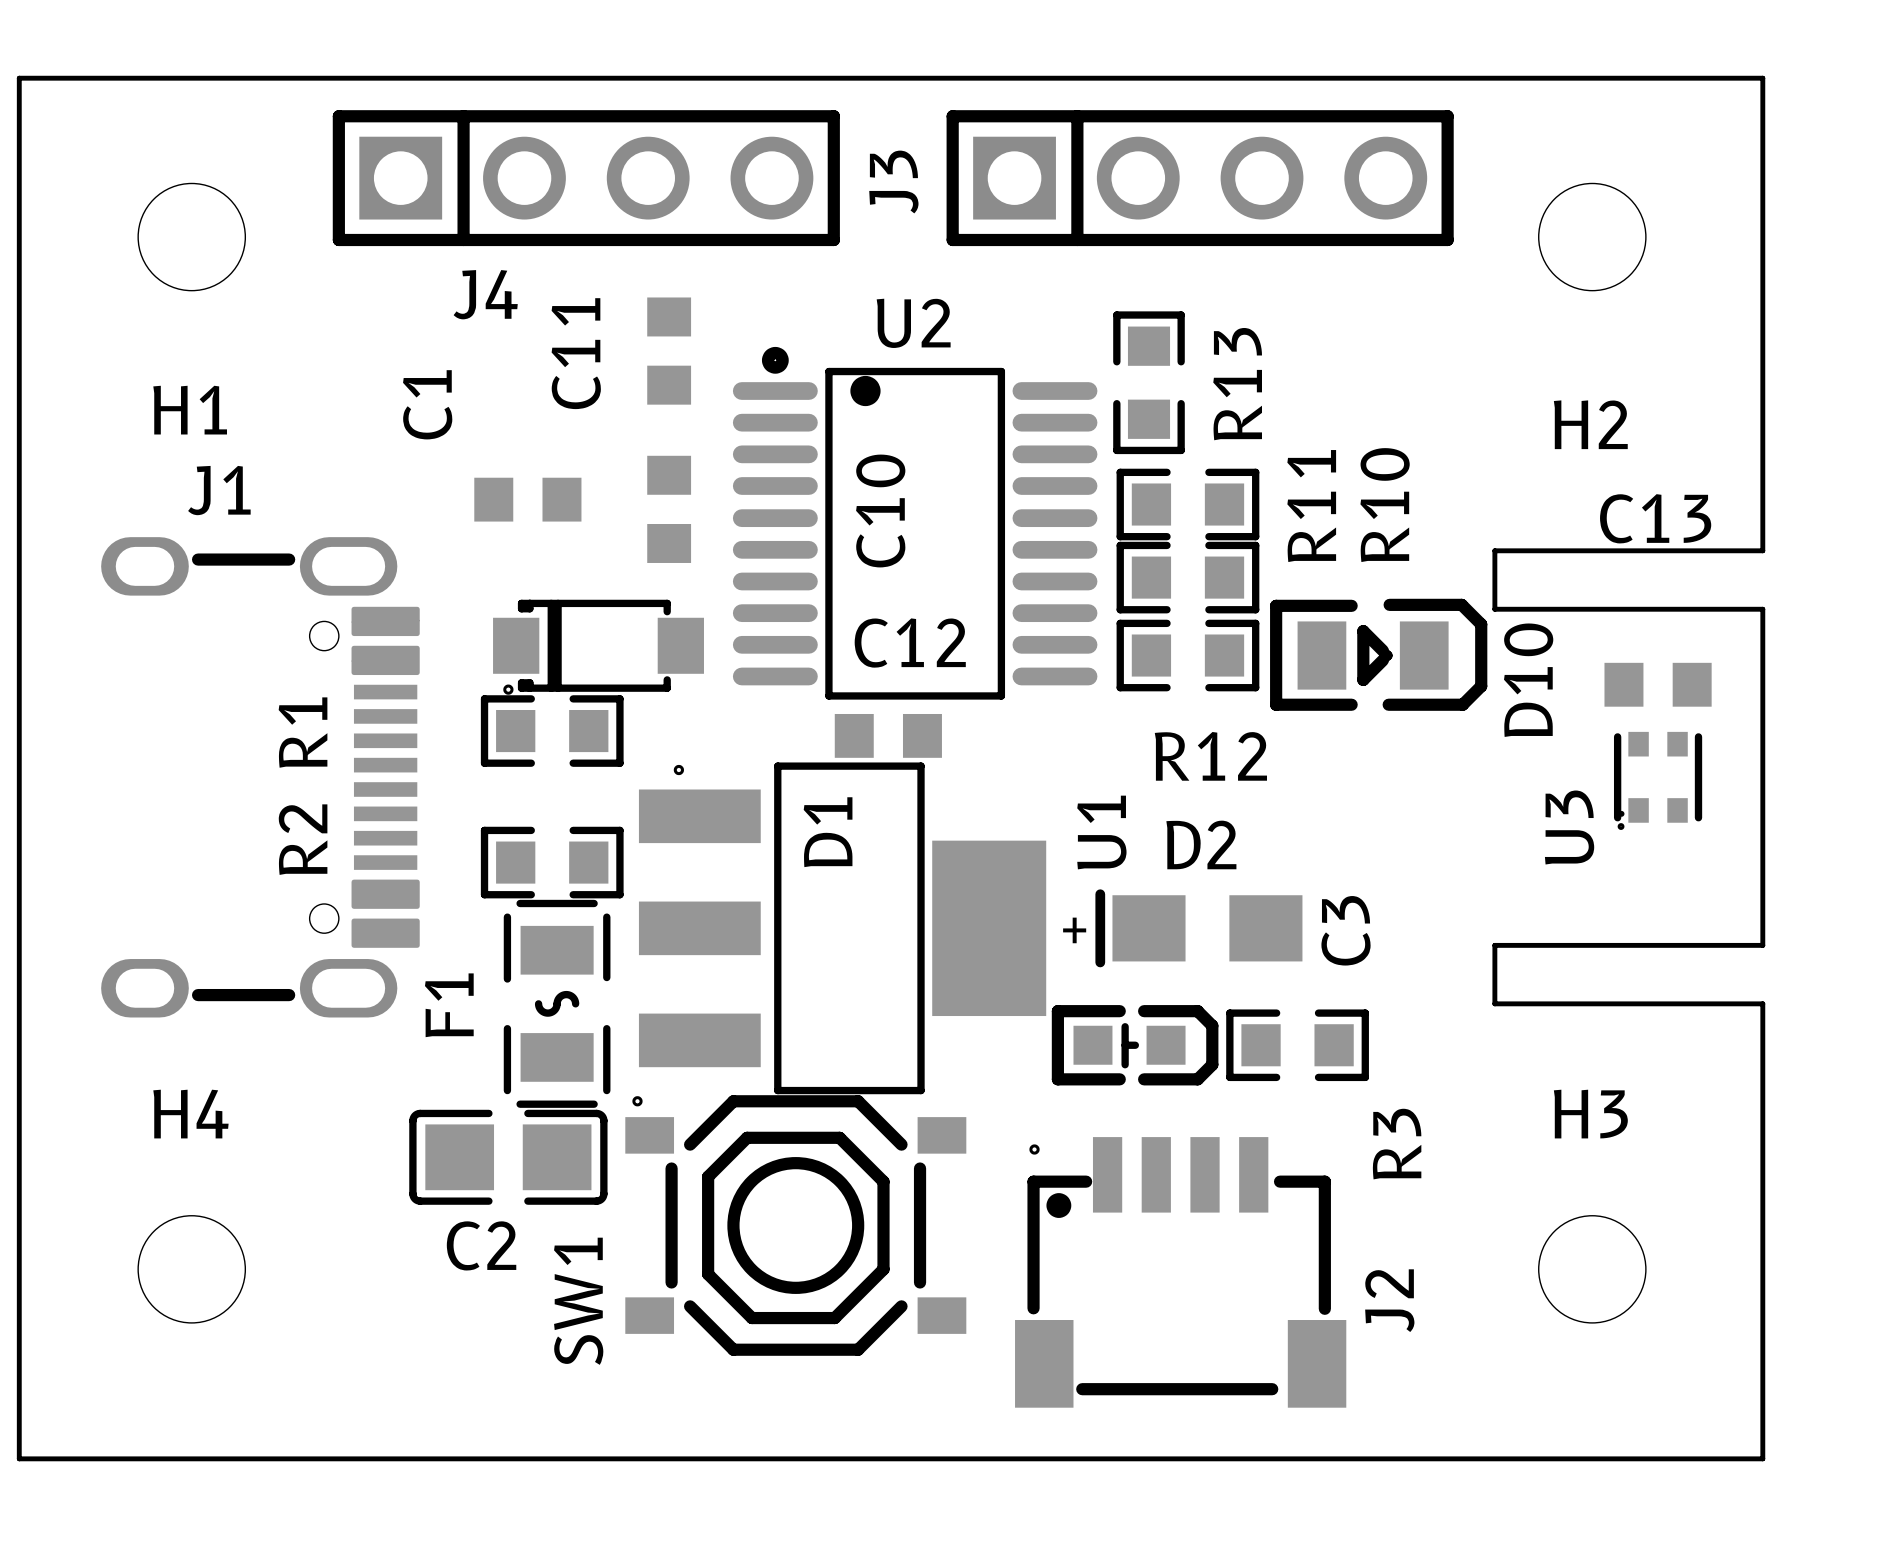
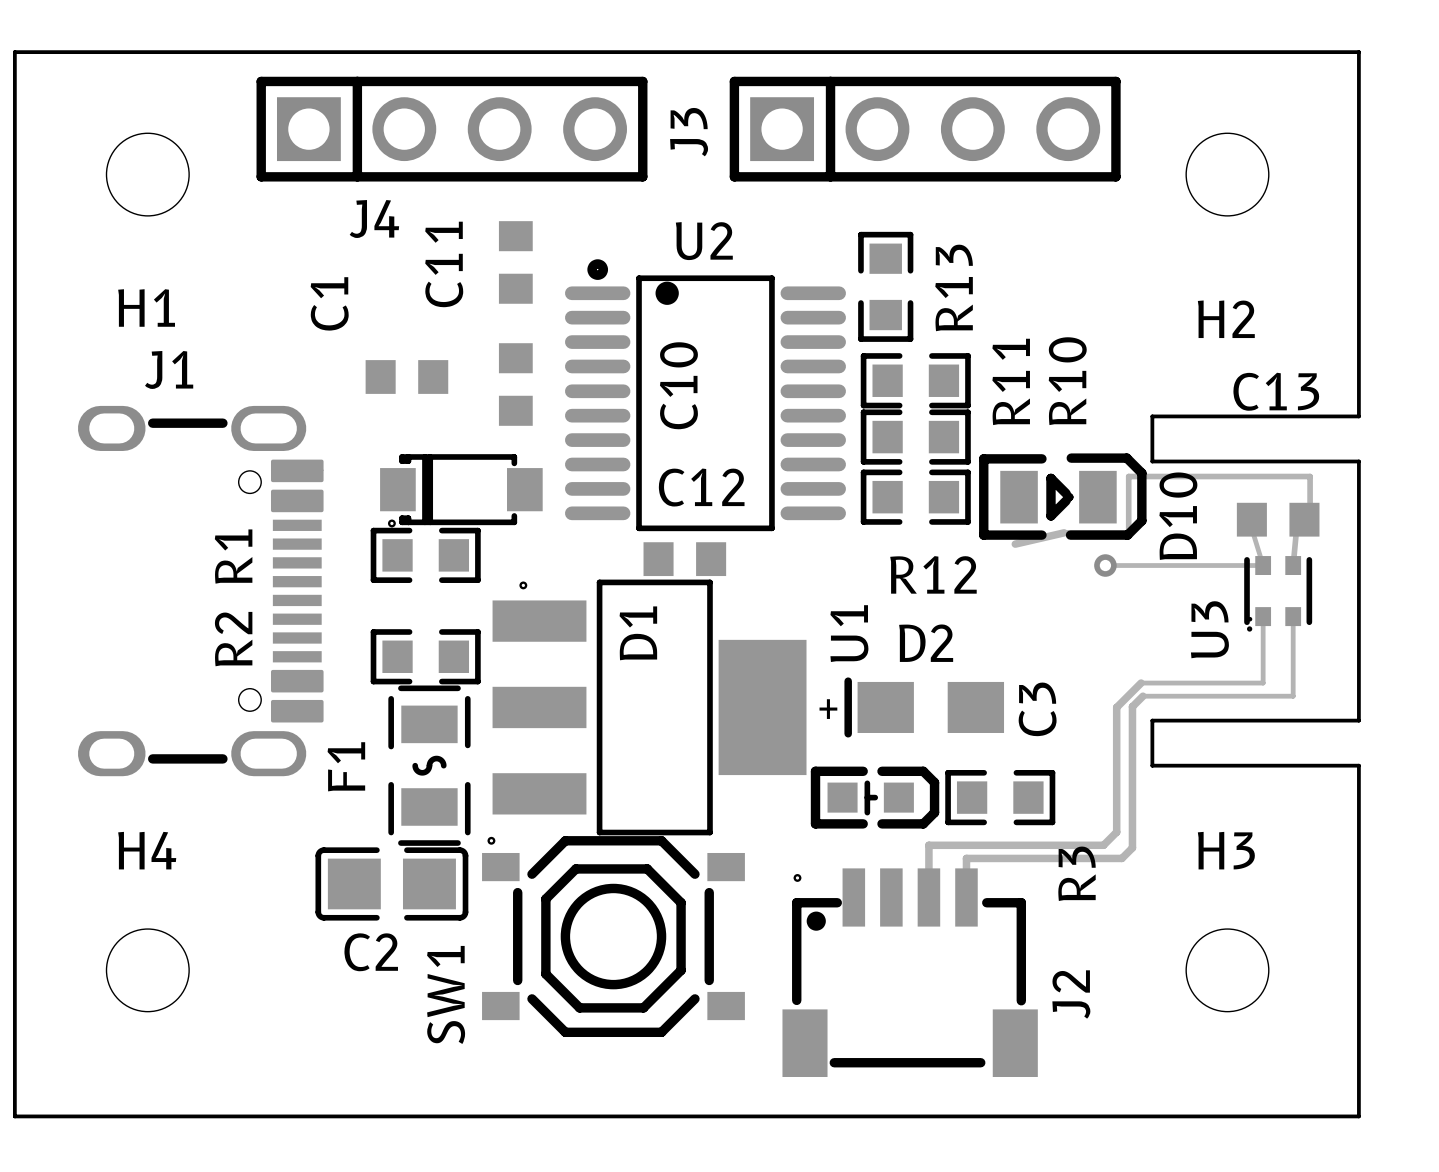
track: none -> (1310, 519) (1310, 476) (1128, 476) (1128, 532) (1064, 532) (1015, 544)
track: none -> (1296, 525) (1293, 565)
track: none -> (1251, 529) (1263, 565) (1105, 565)
via: none -> (1105, 565)
track: none -> (1263, 616) (1263, 683) (1141, 683) (1116, 707) (1116, 832) (1103, 845) (928, 845) (928, 876)
track: none -> (1293, 616) (1293, 696) (1142, 696) (1132, 706) (1132, 847) (1121, 858) (966, 858) (966, 876)

